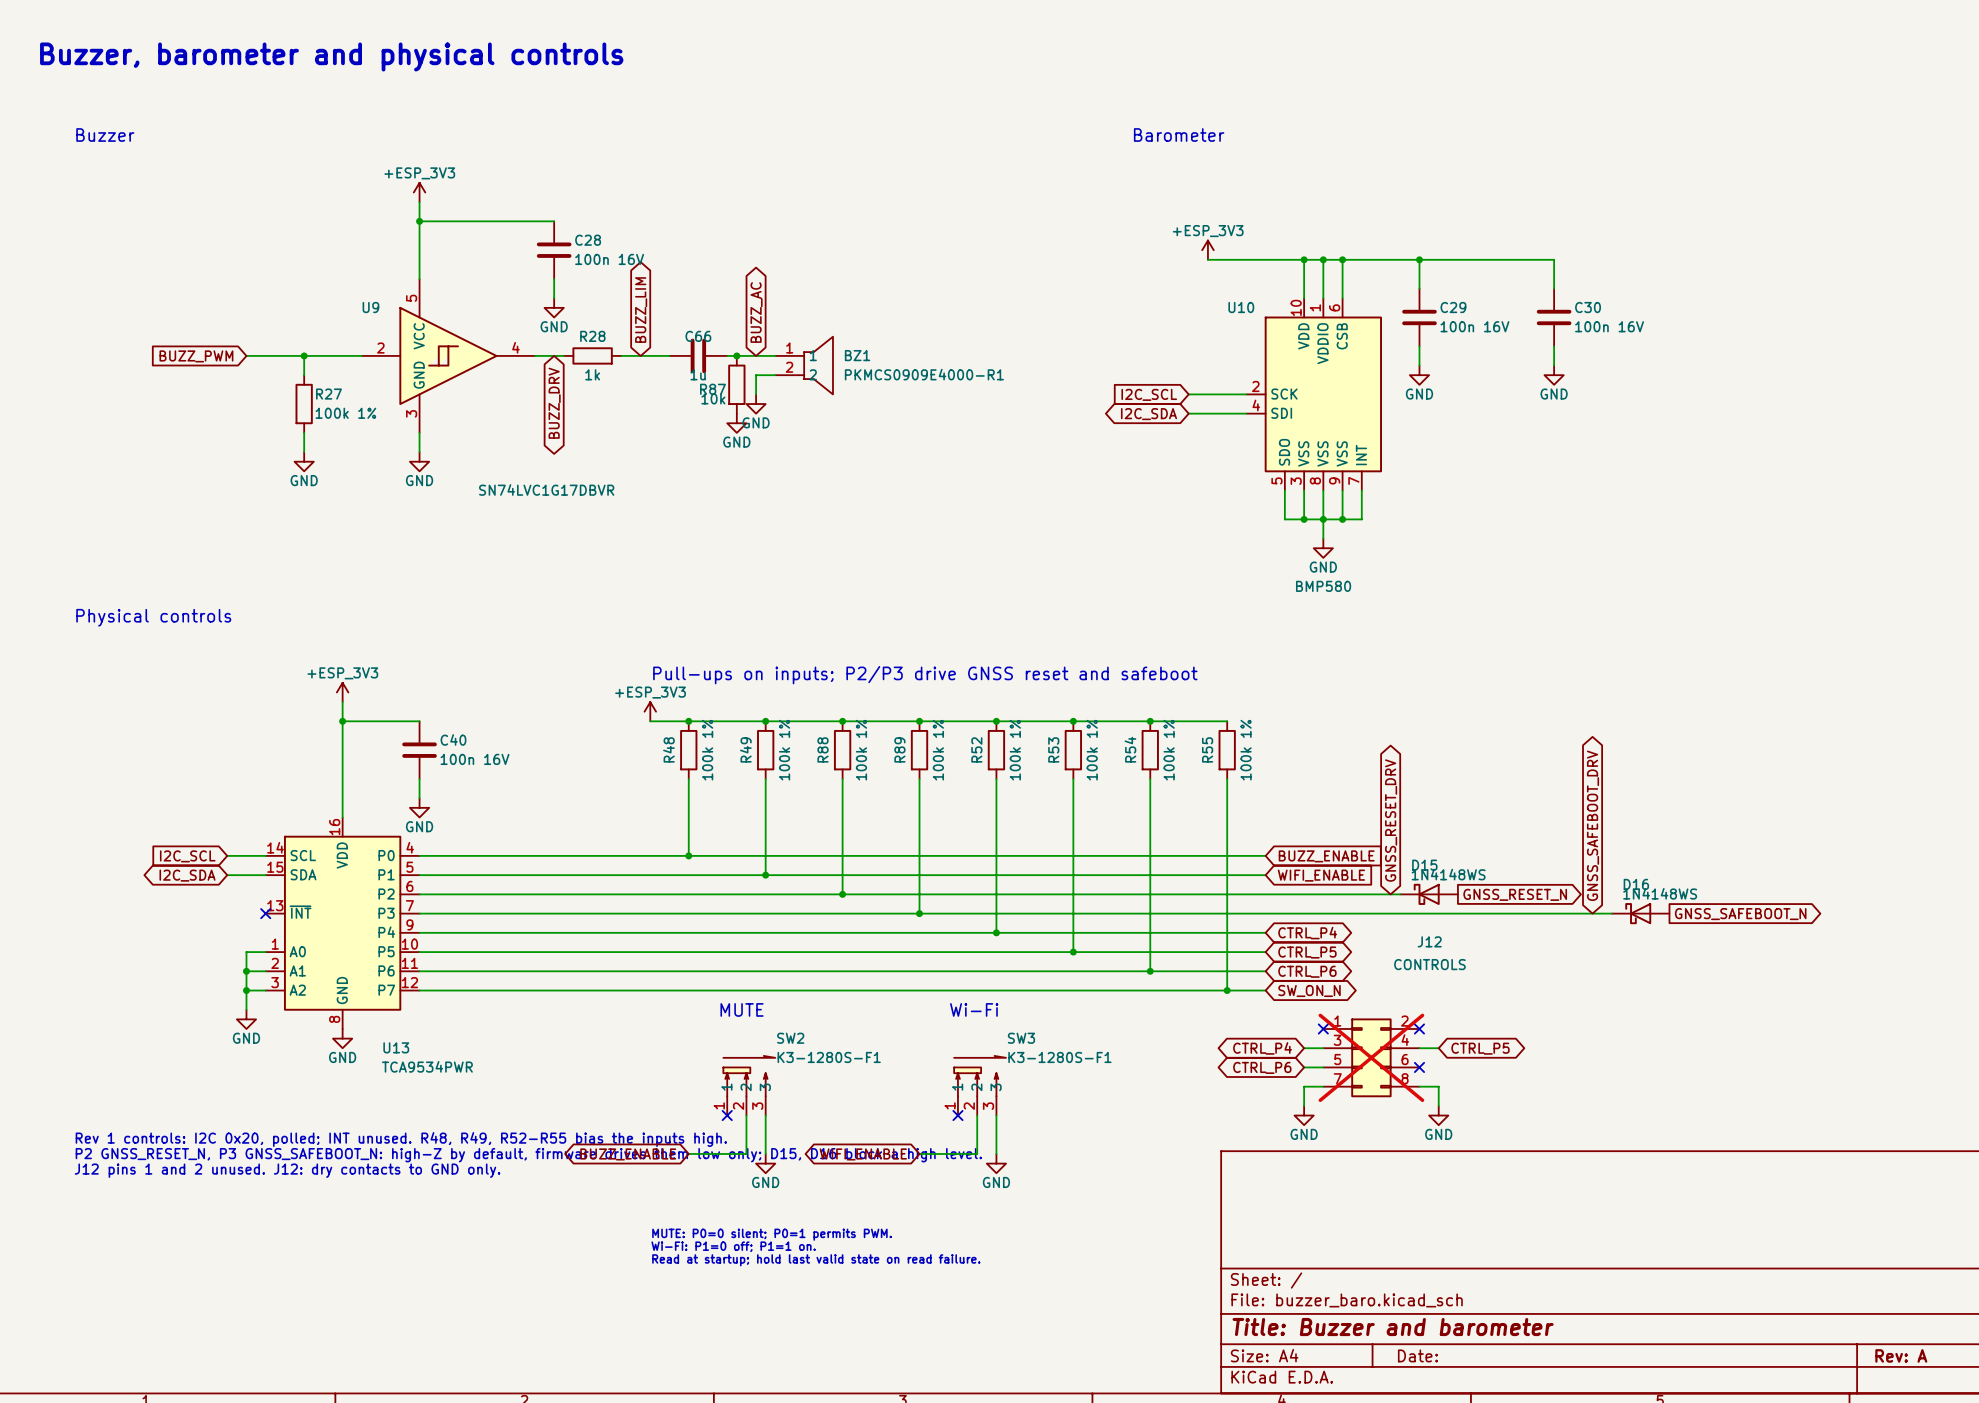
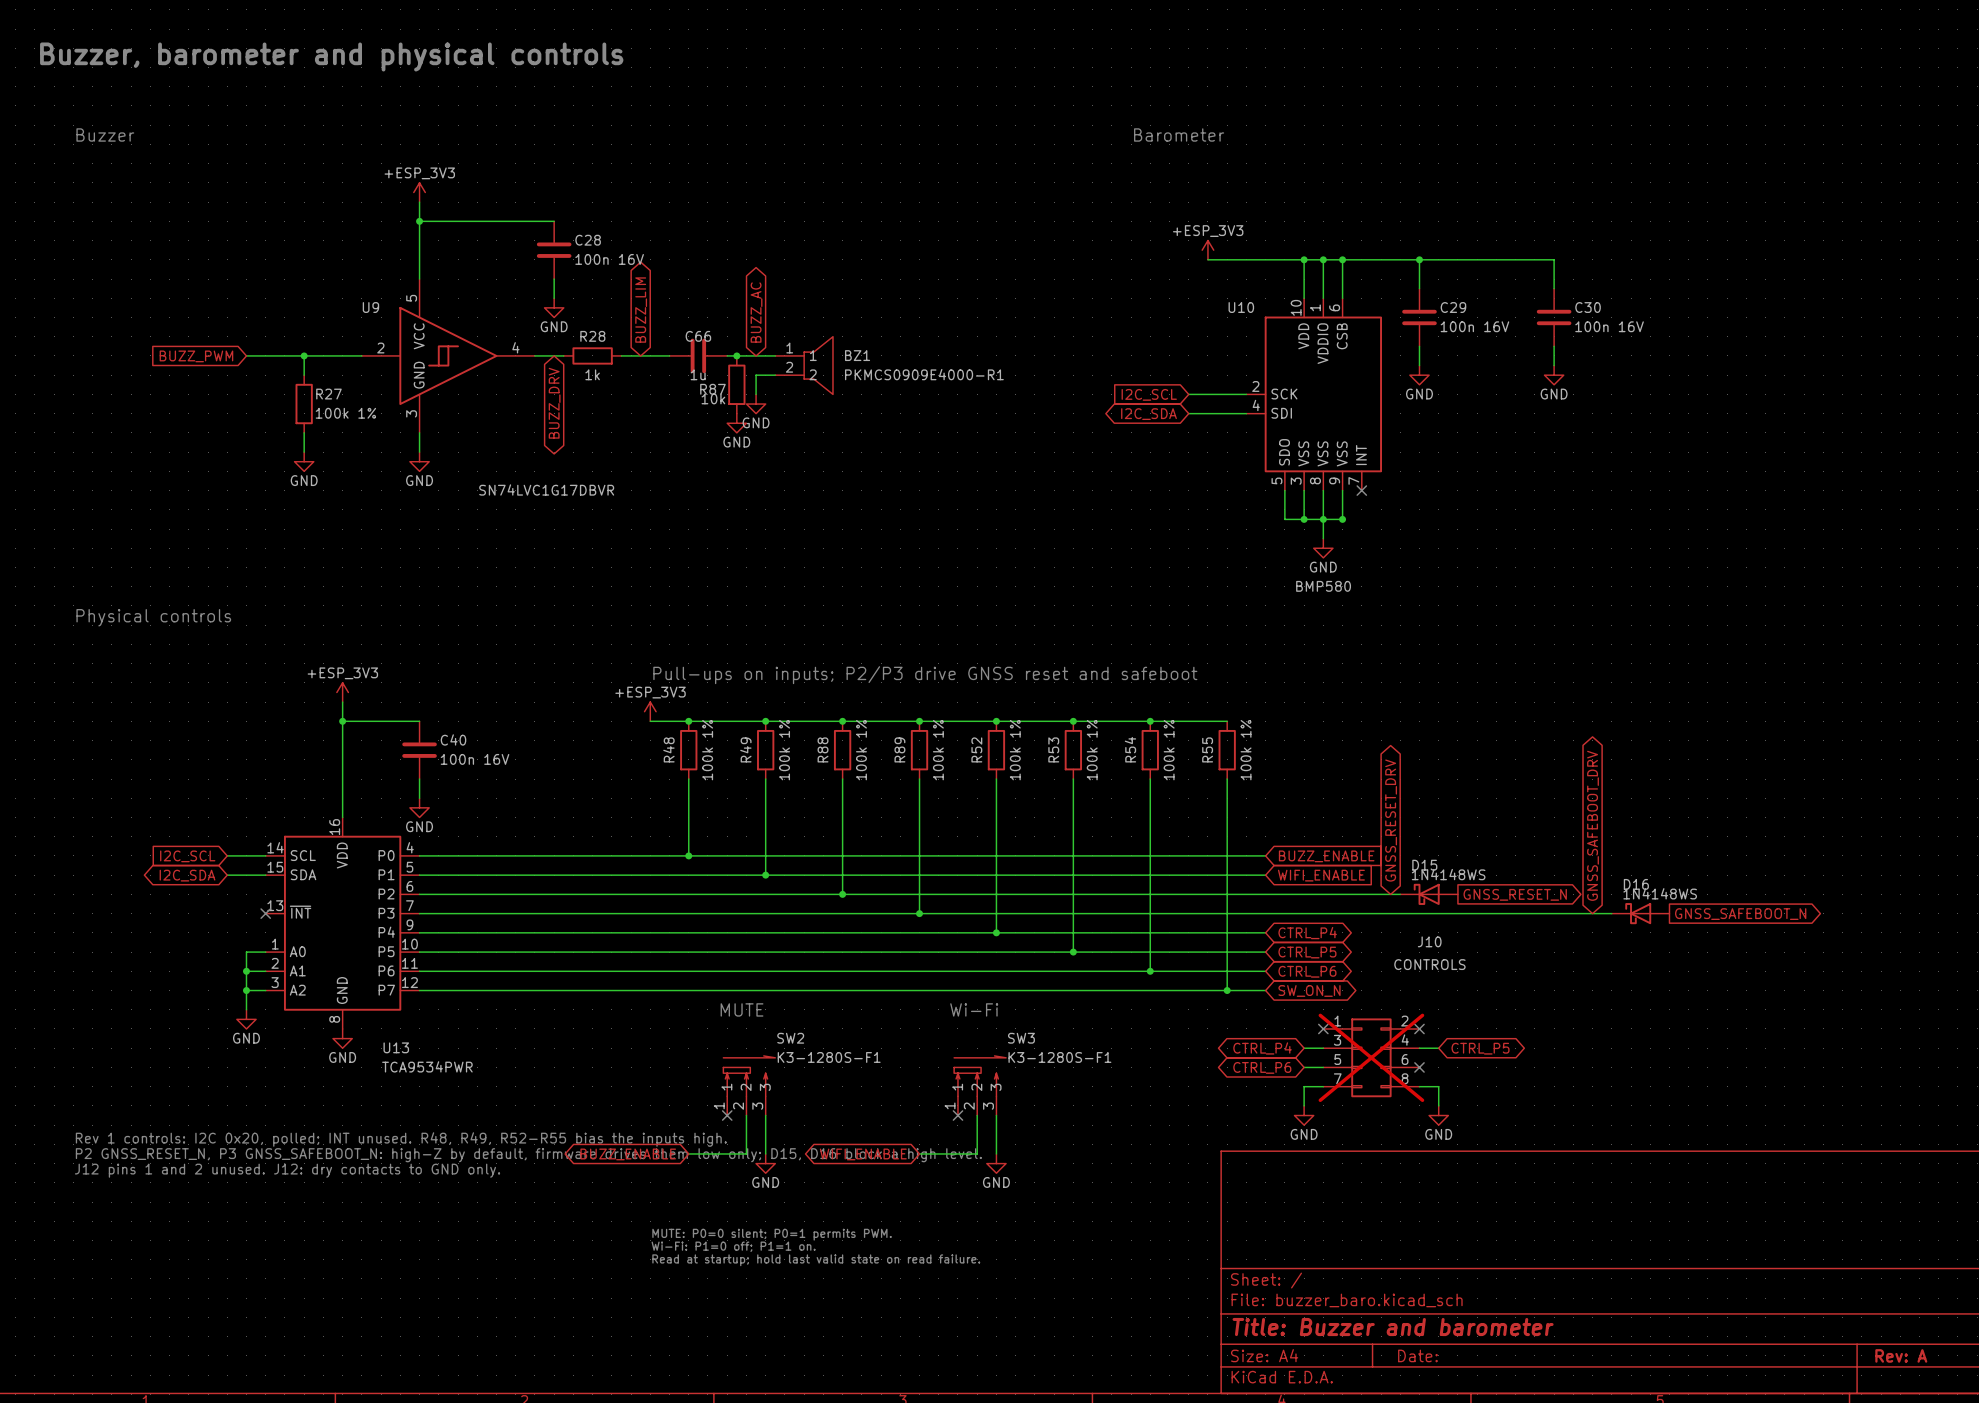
wire: (1361, 490) (1361, 519) (1342, 519) -> none
no-connect mark: none -> (1361, 490)
J12 name: J12 (1429, 941) -> J10 (1429, 941)

